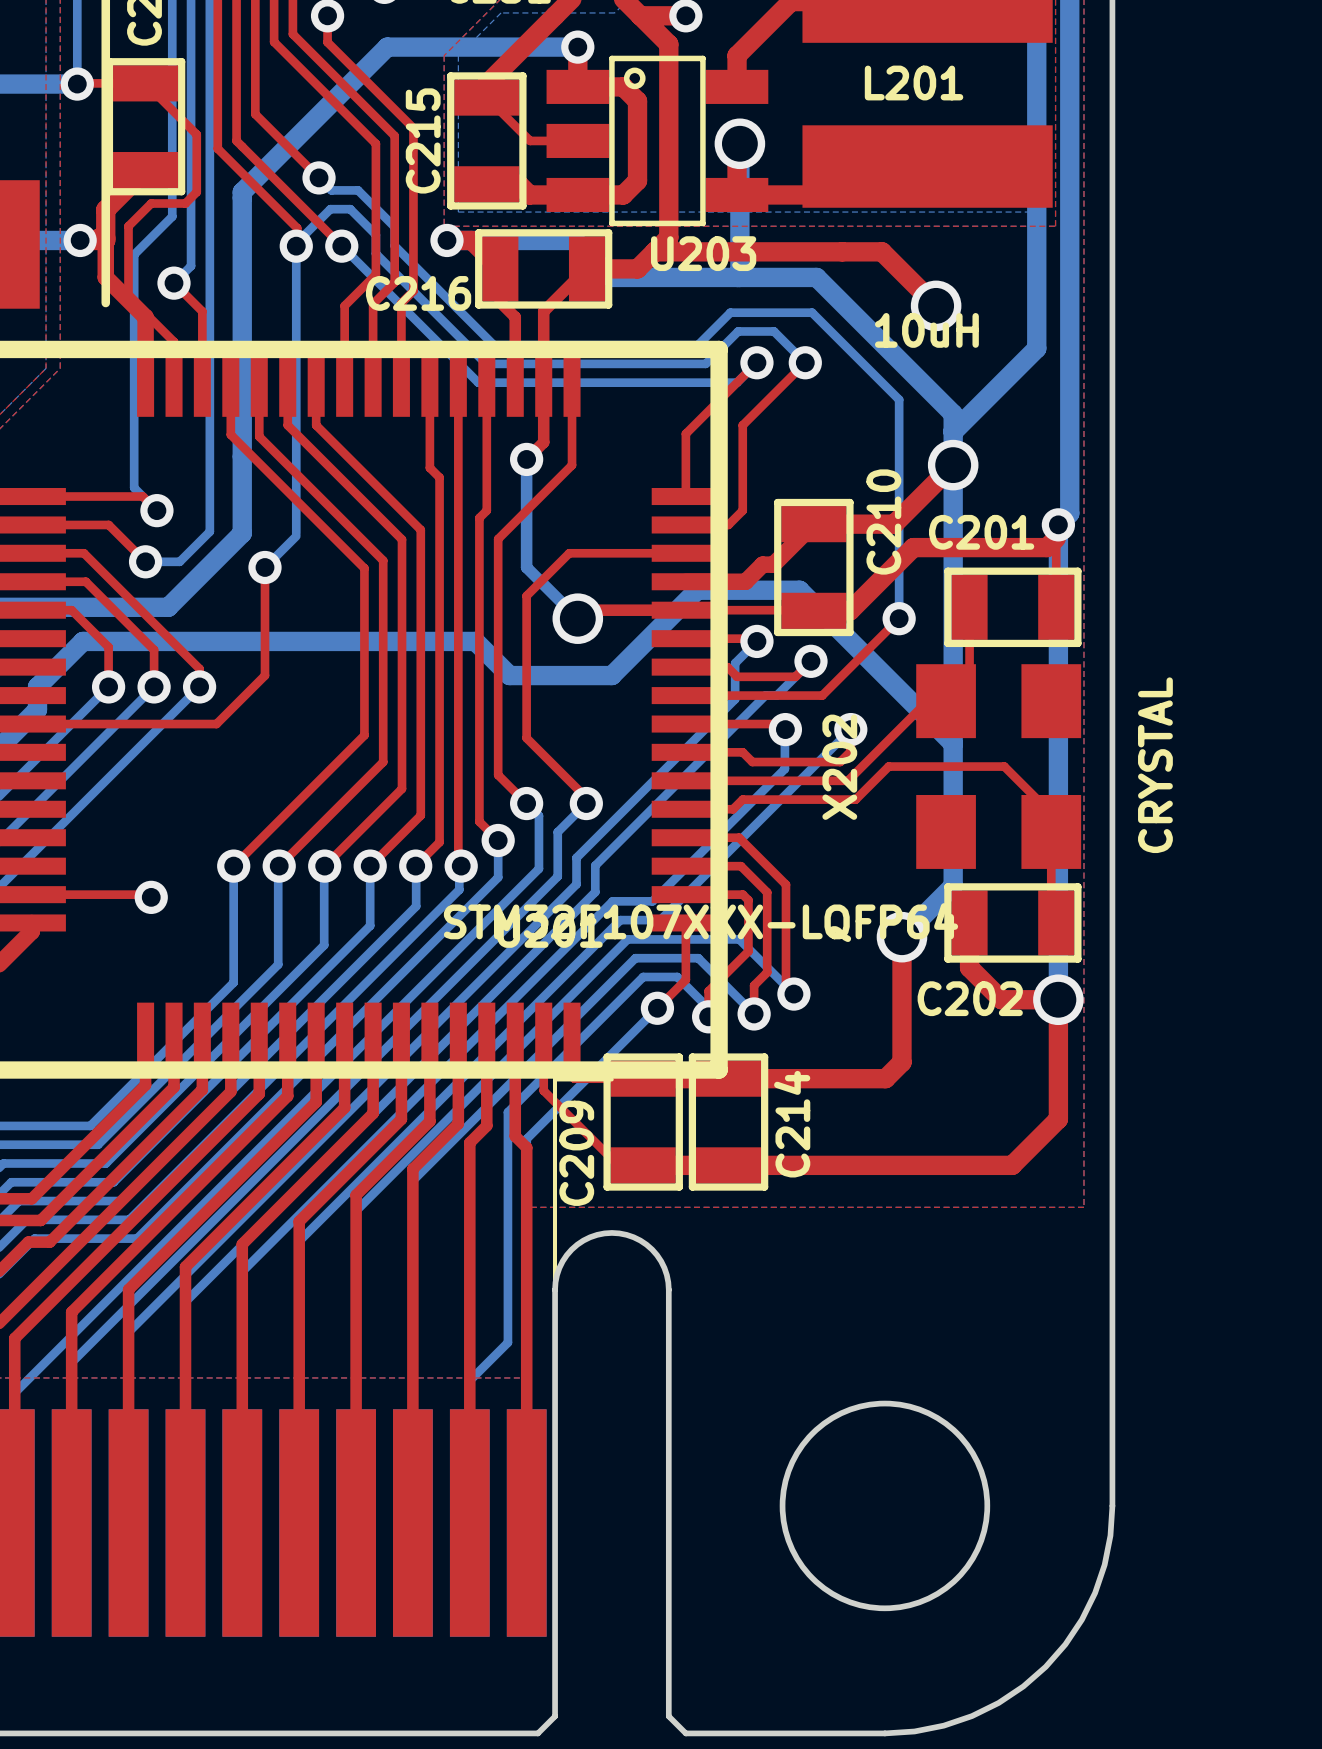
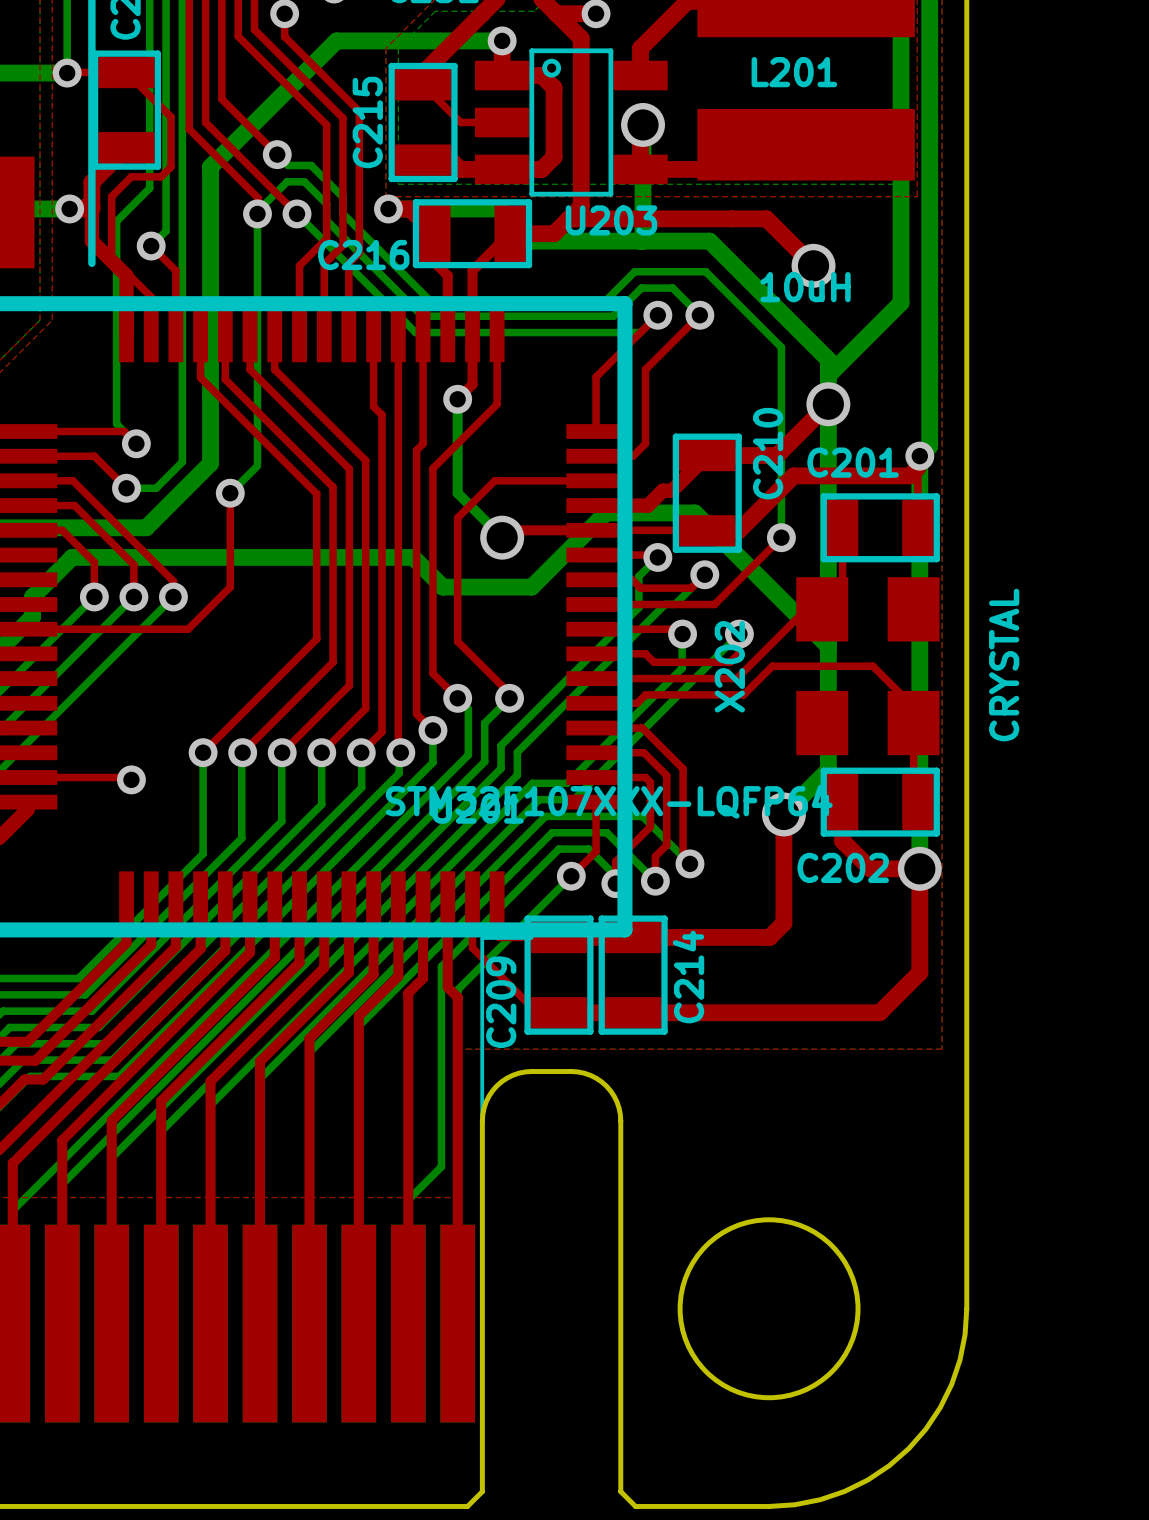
board edge: (555, 1289) (556, 1275) (566, 1255) (583, 1240) (604, 1233) (619, 1233) (640, 1240) (657, 1255) (664, 1268) (668, 1289) (668, 1716) (685, 1733) (731, 1733) -> (482, 1120) (484, 1108) (492, 1090) (507, 1078) (525, 1071) (584, 1073) (596, 1078) (606, 1085) (617, 1102) (620, 1120) (620, 1491) (635, 1506)

